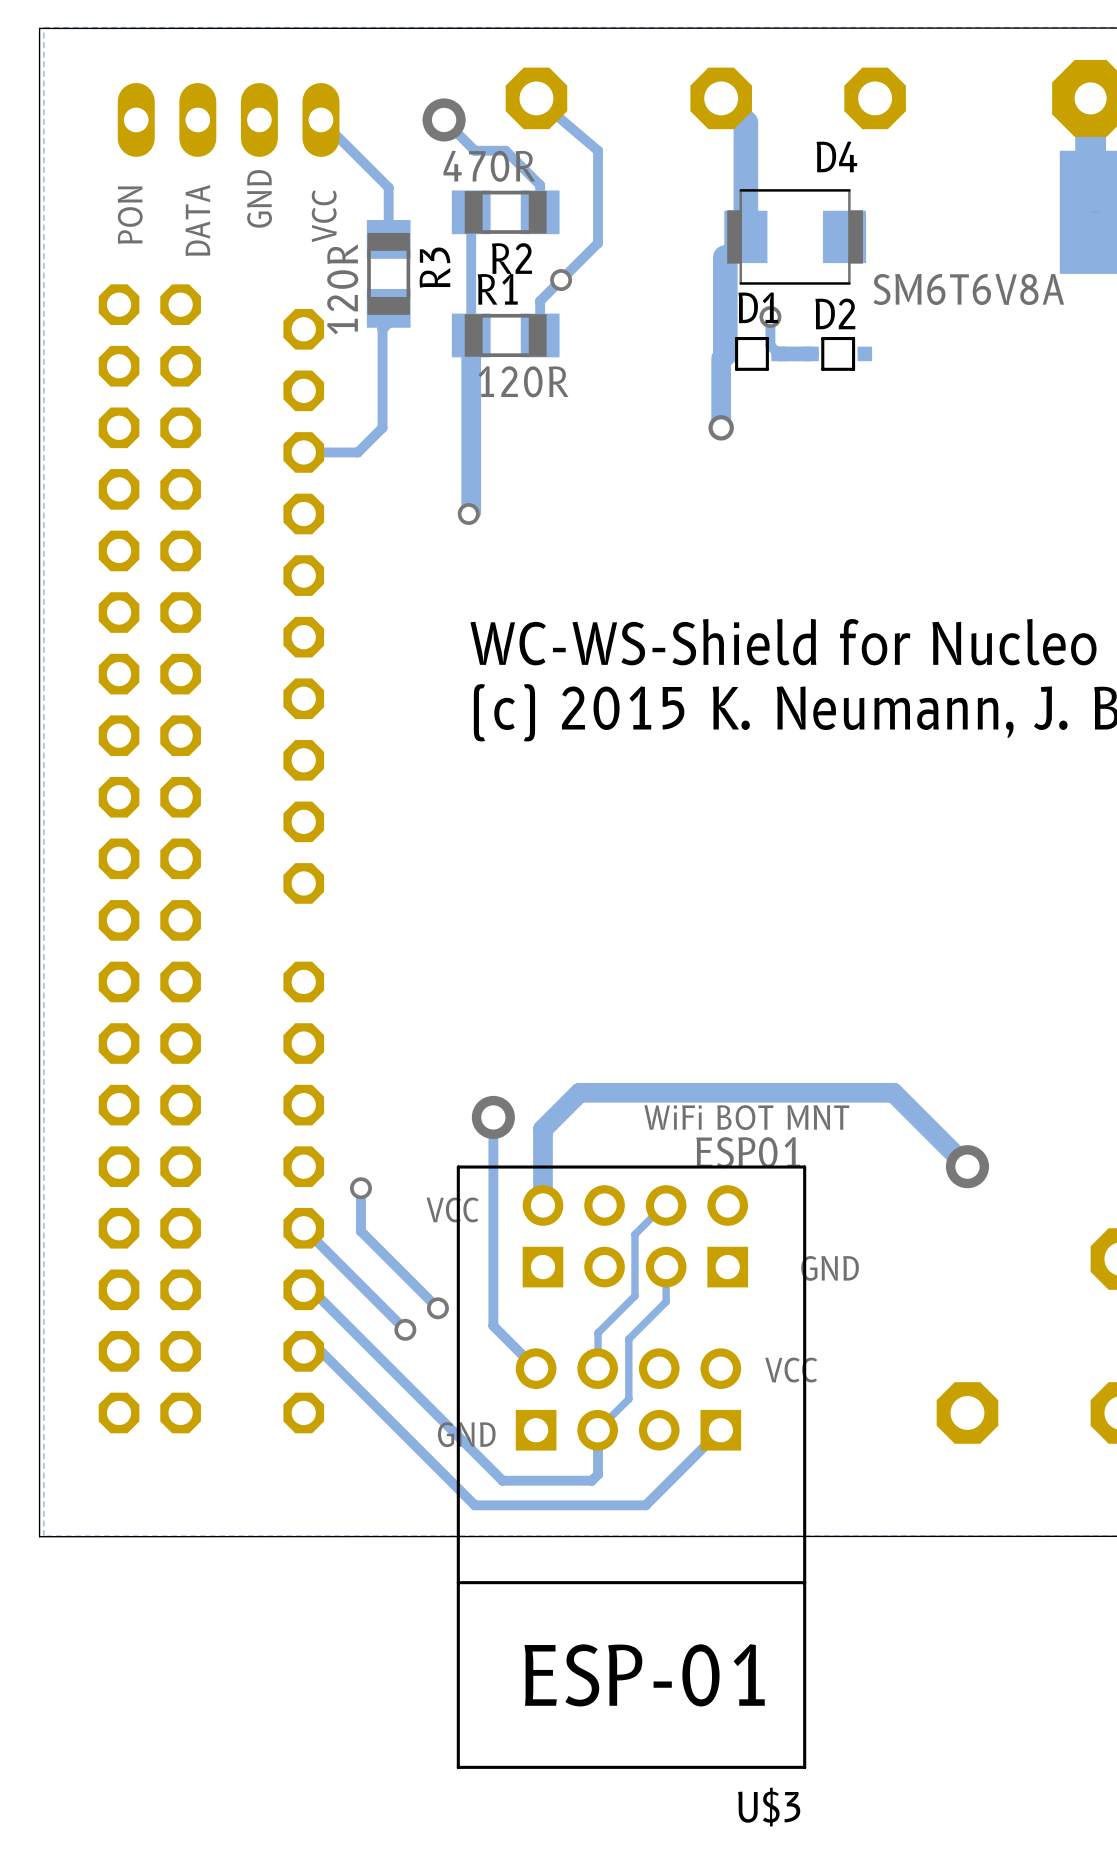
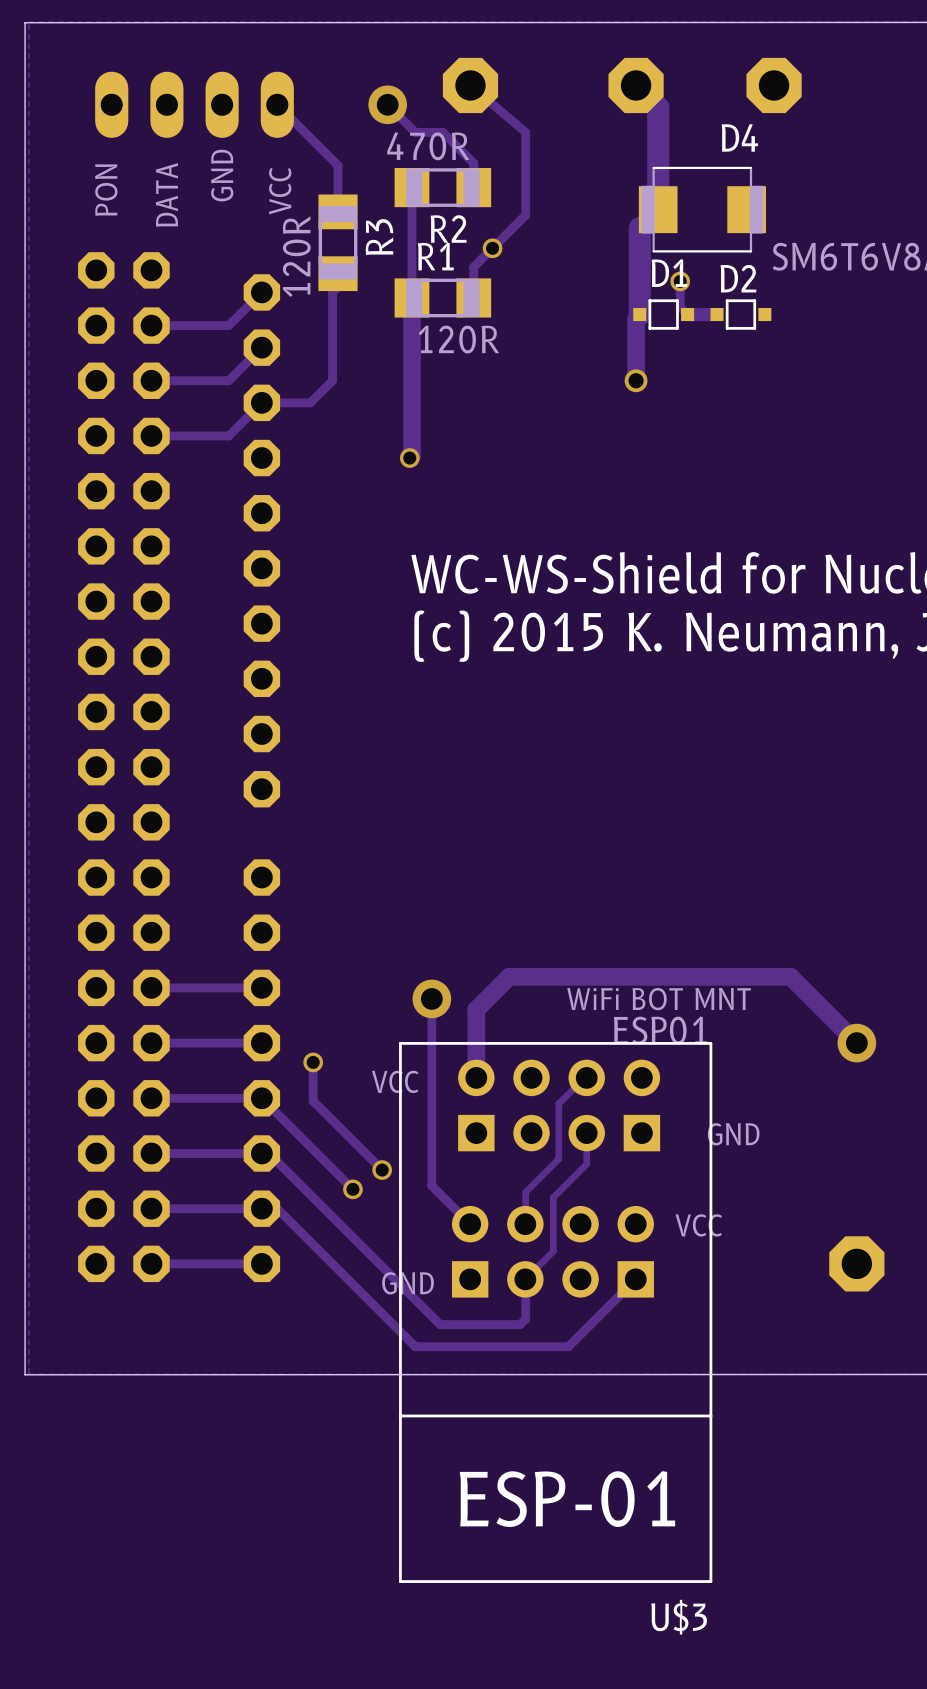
track: none -> (261, 292) (228, 325) (151, 325)
track: none -> (261, 347) (228, 380) (151, 380)
track: none -> (261, 402) (228, 435) (151, 435)
track: none -> (261, 987) (151, 987)
track: none -> (261, 1043) (151, 1043)
track: none -> (261, 1098) (151, 1098)
track: none -> (261, 1153) (151, 1153)
track: none -> (261, 1208) (151, 1208)
track: none -> (261, 1263) (151, 1263)

